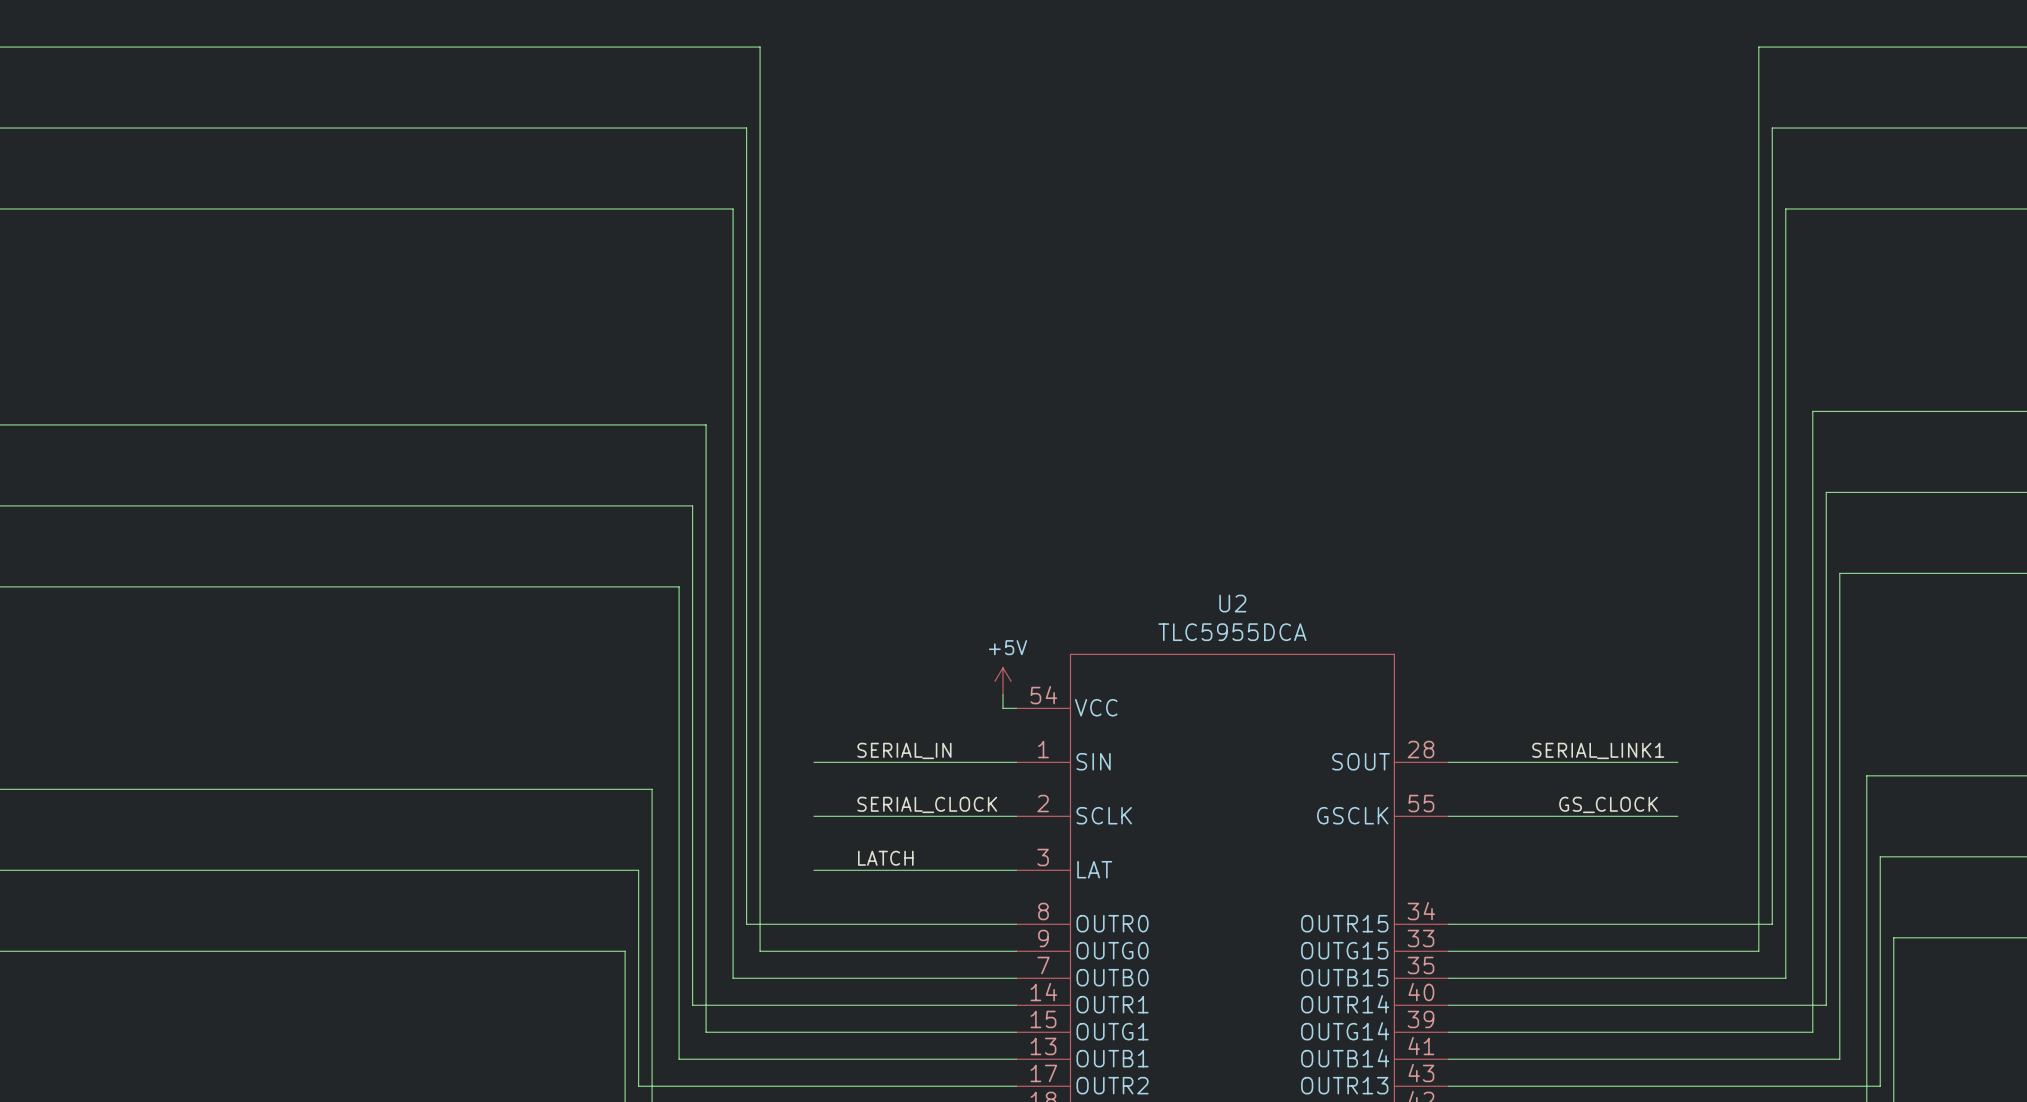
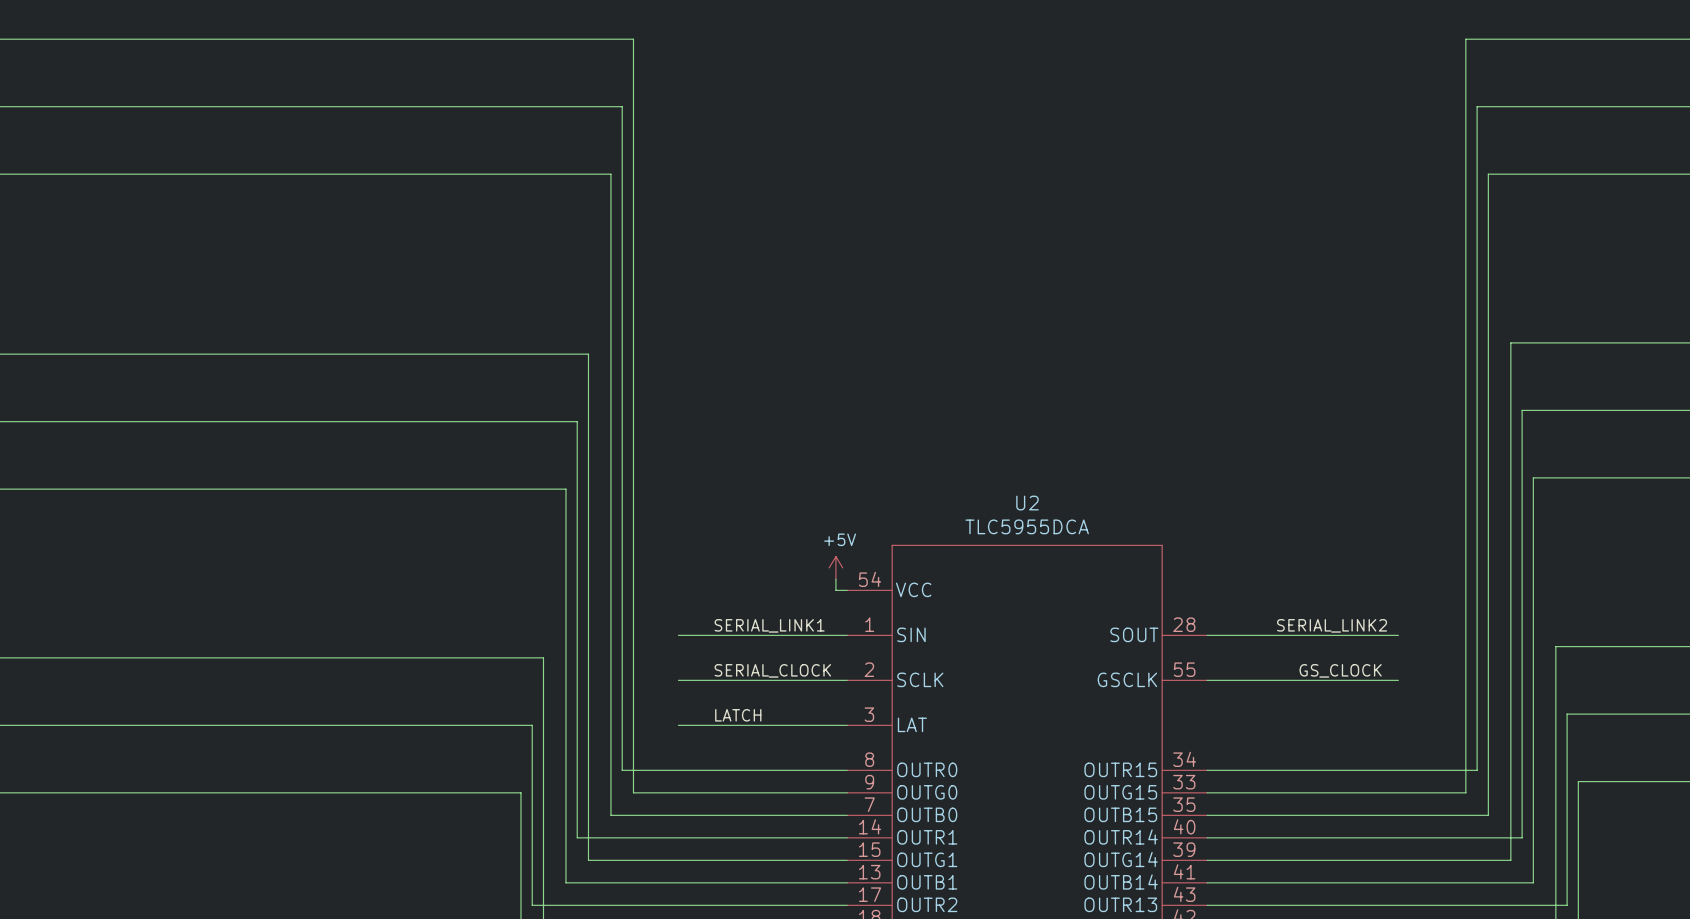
label: SERIAL_IN (904, 750) -> SERIAL_LINK1 (769, 625)
label: SERIAL_LINK1 (1598, 750) -> SERIAL_LINK2 (1332, 625)

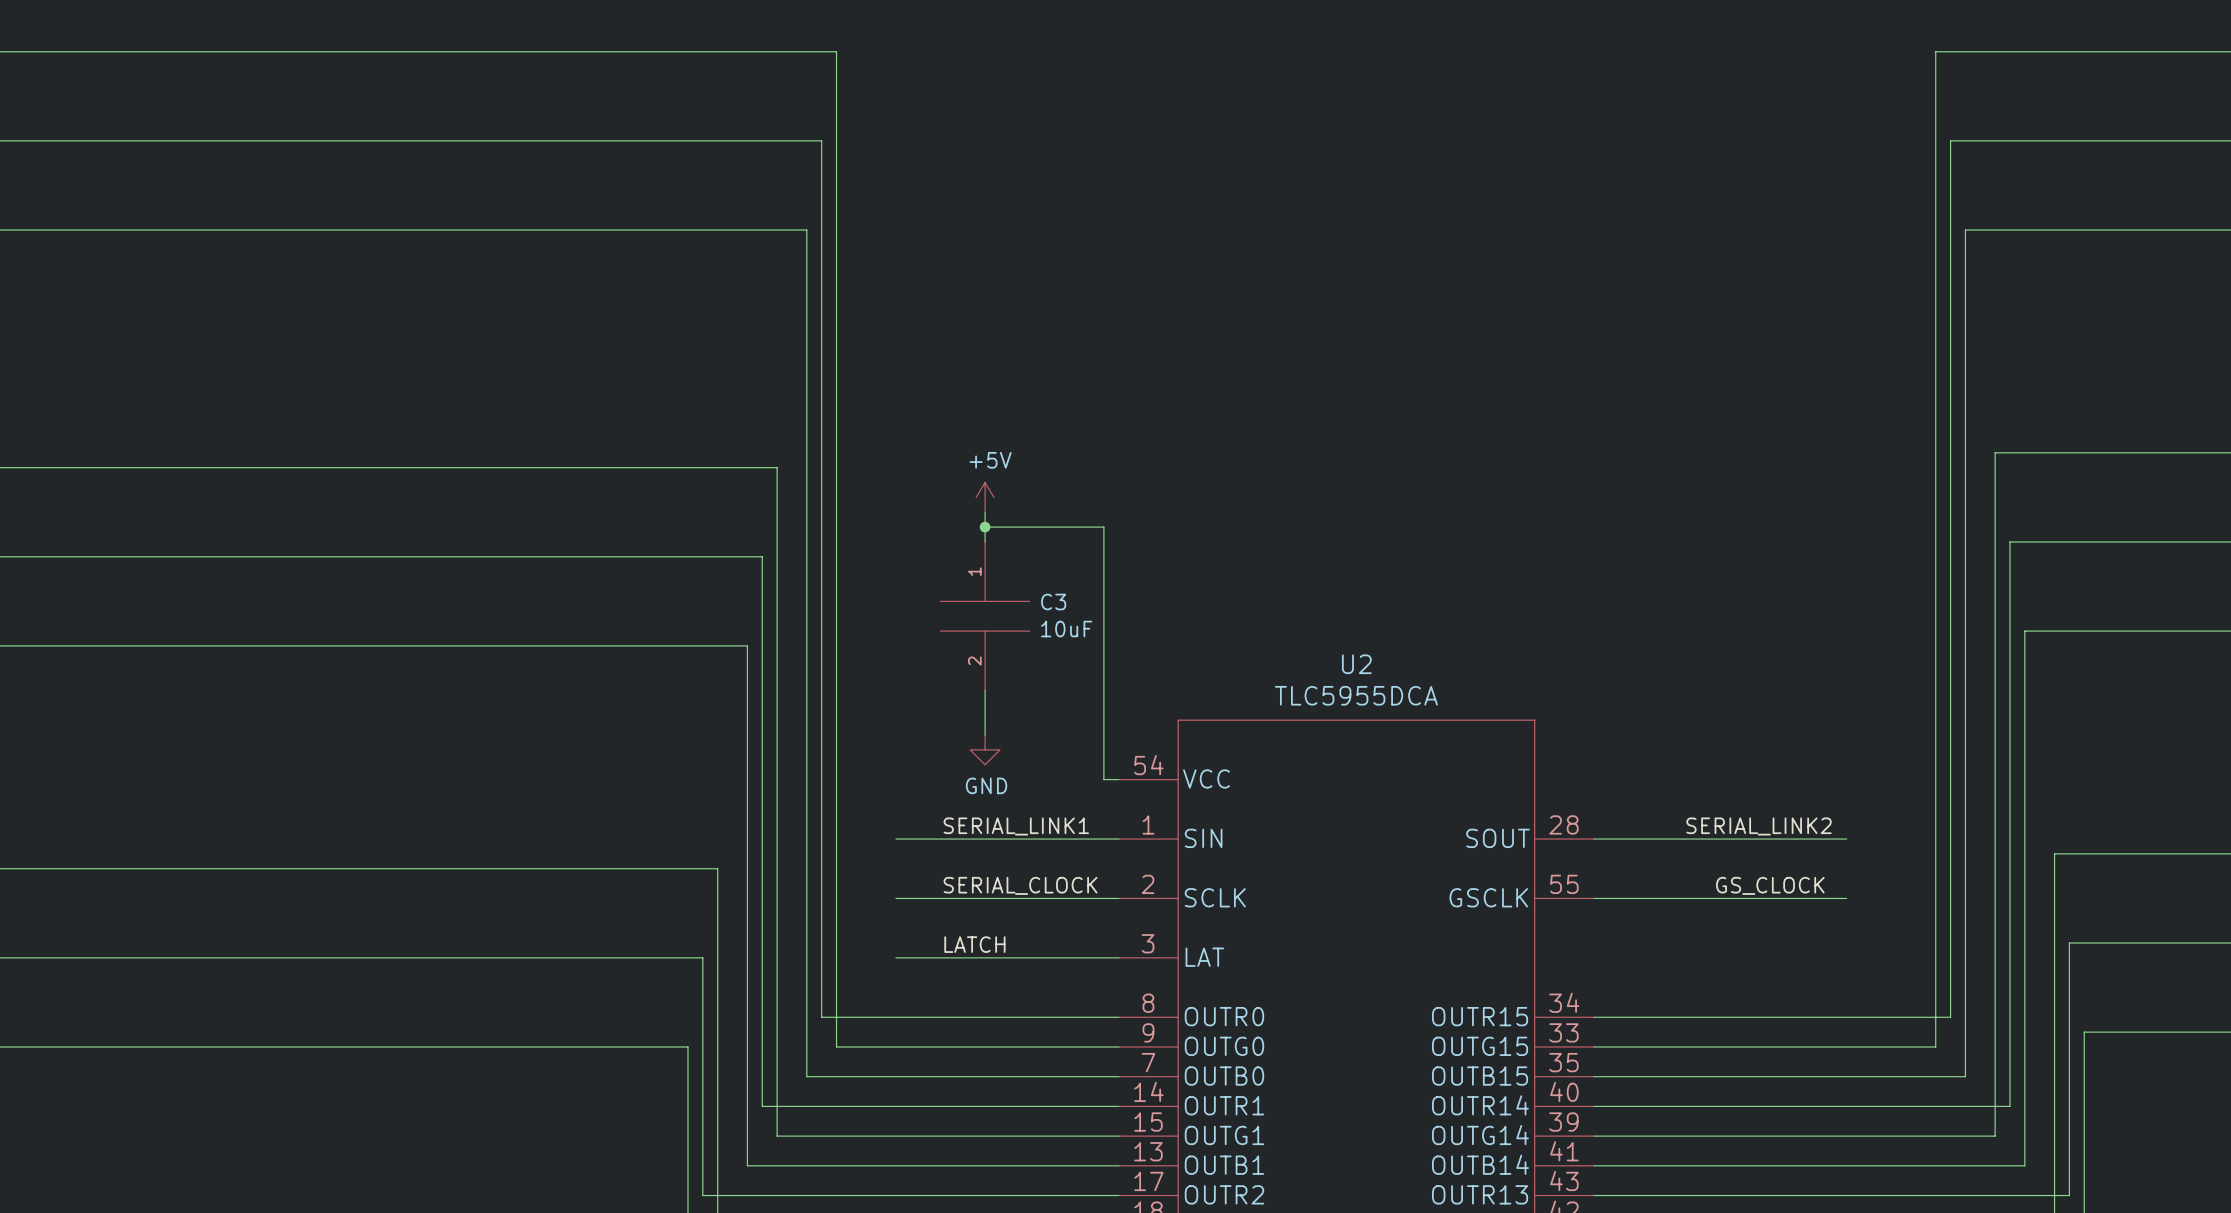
wire: none -> (985, 512) (985, 541)
wire: none -> (985, 527) (1103, 527) (1103, 764)
junction: none -> (985, 527)
C3: none -> 10uF (985, 616)
wire: none -> (985, 690) (985, 735)
power symbol: none -> GND (985, 749)
power symbol position: +5V (835, 567) -> +5V (985, 497)

